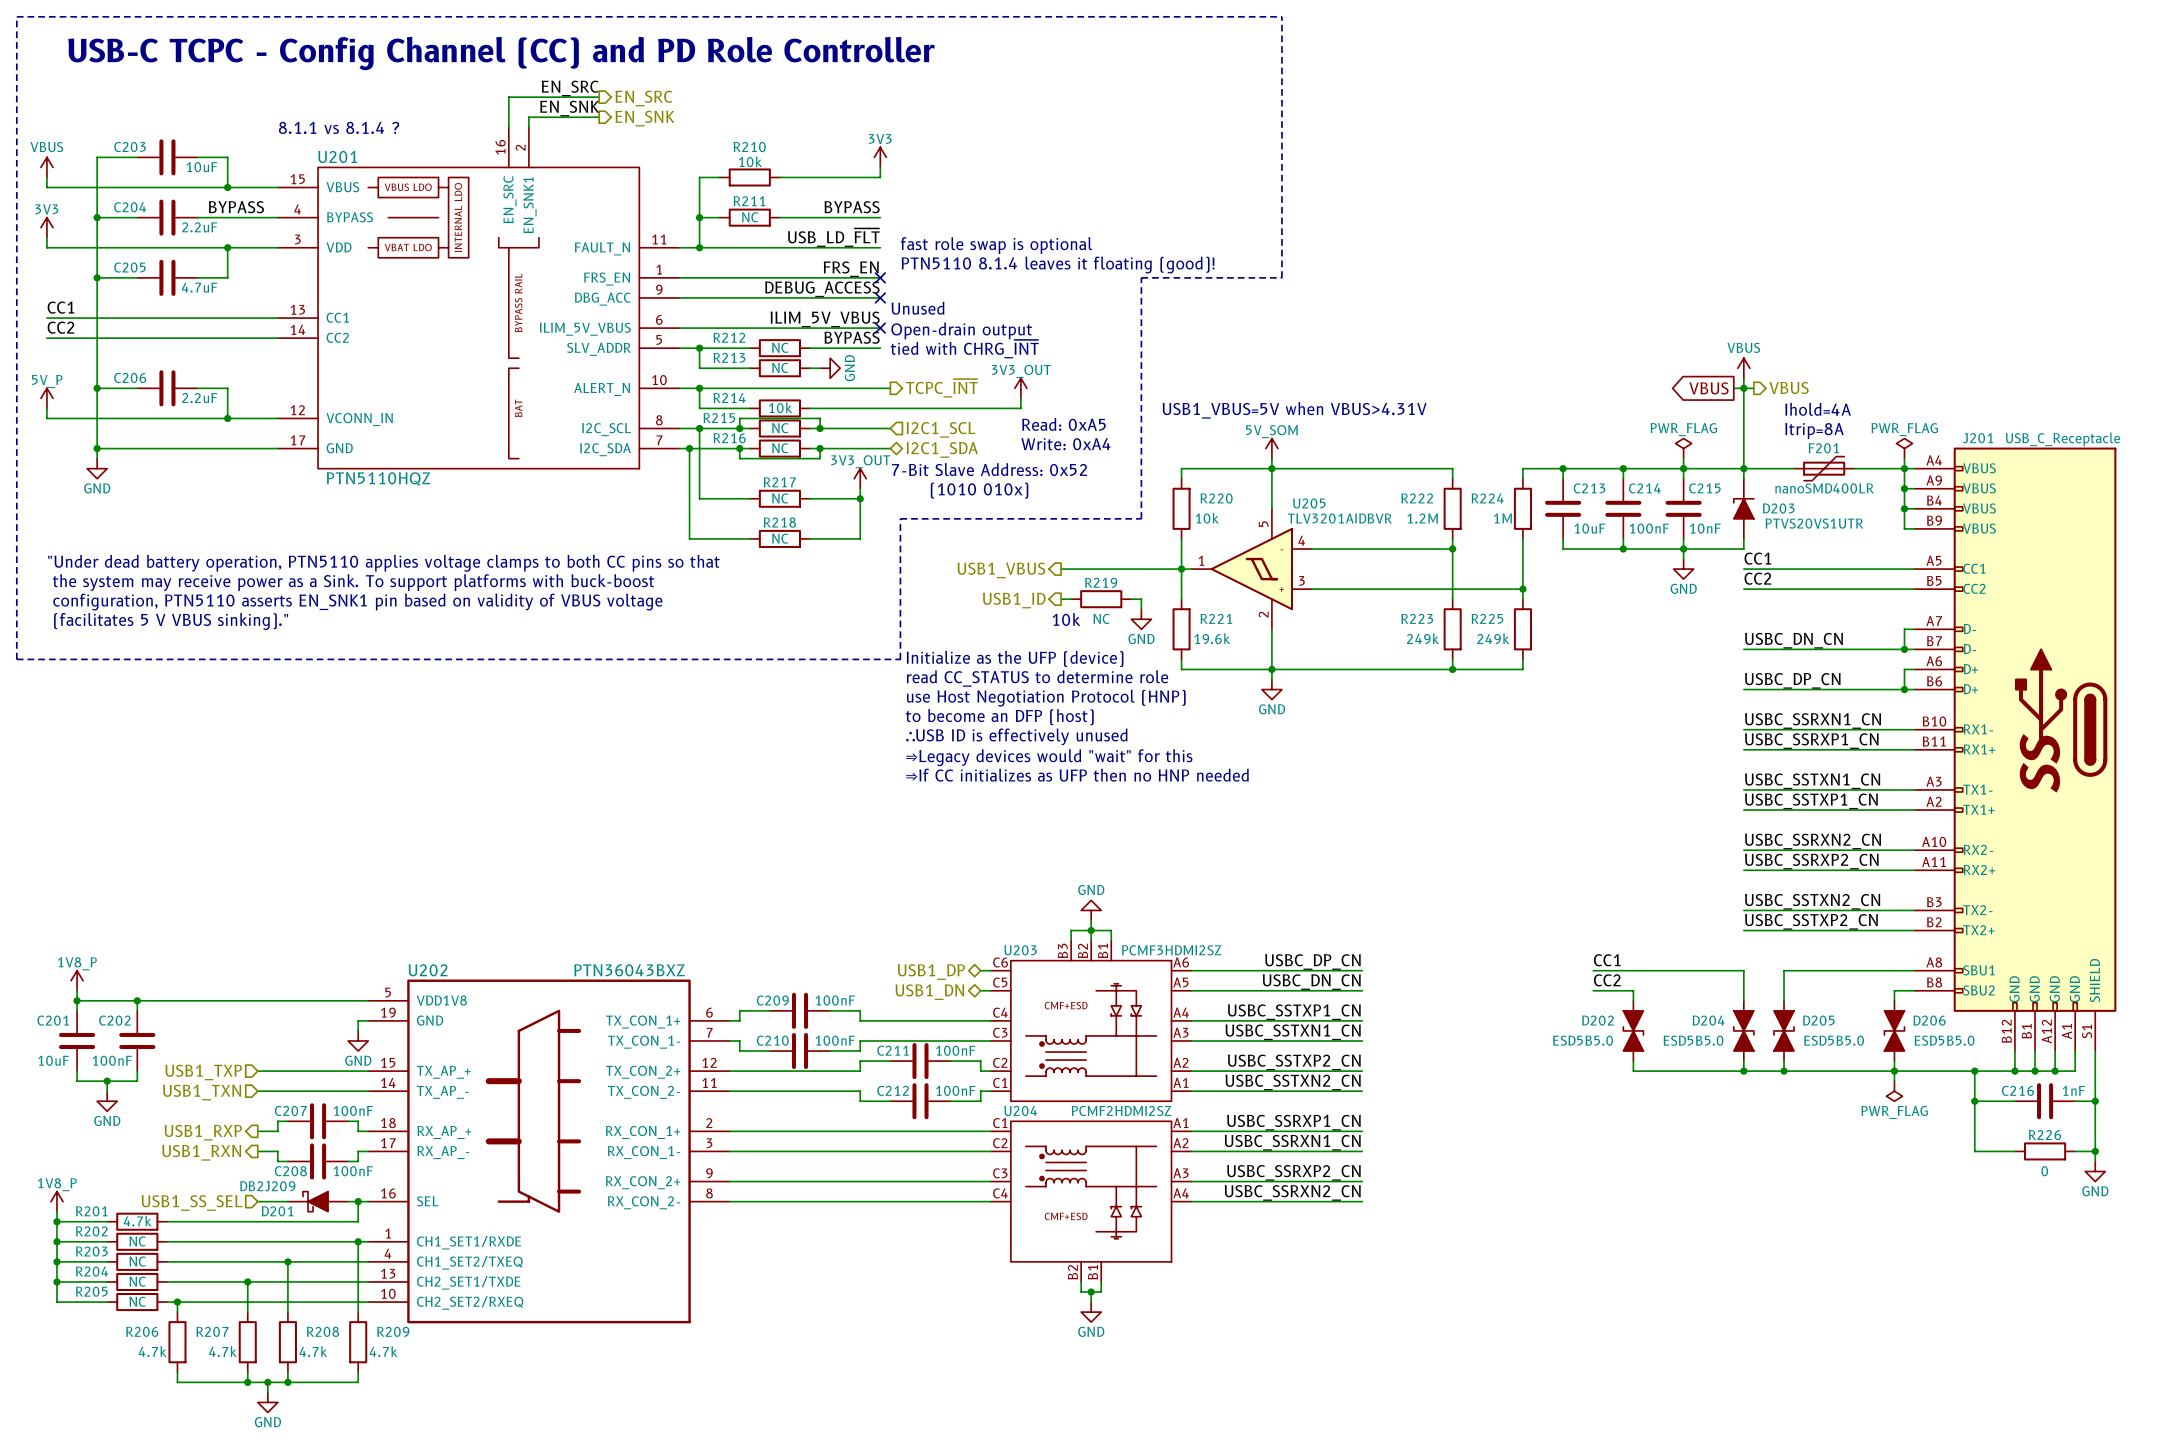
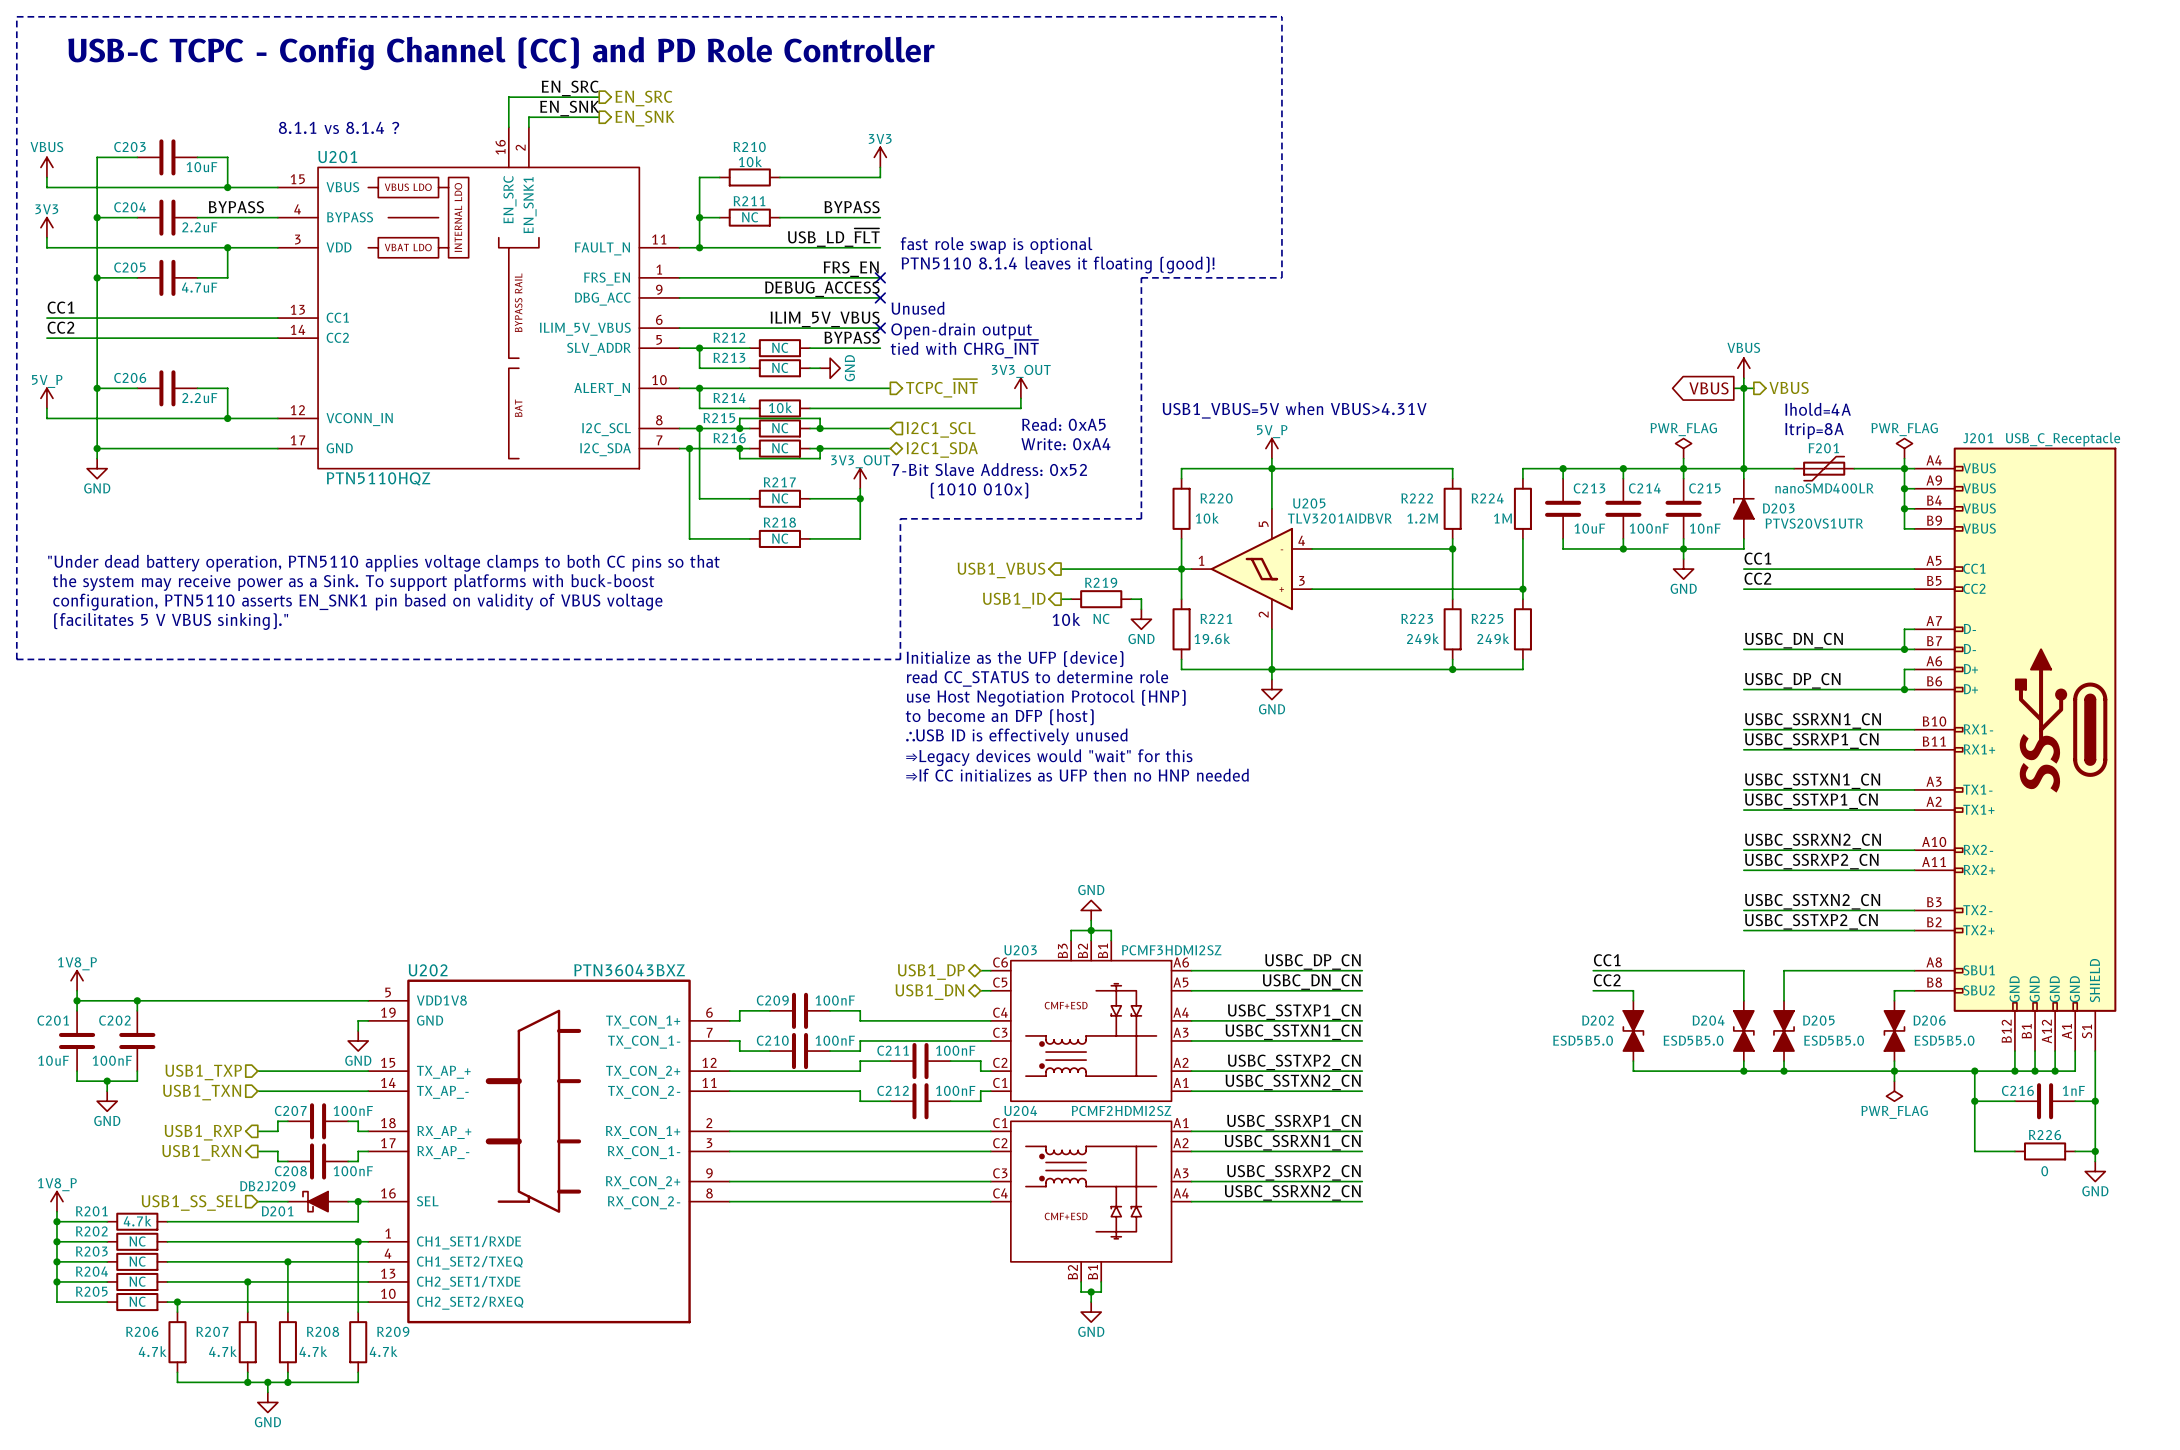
power symbol: 5V_SOM (1271, 448) -> 5V_P (1271, 448)

